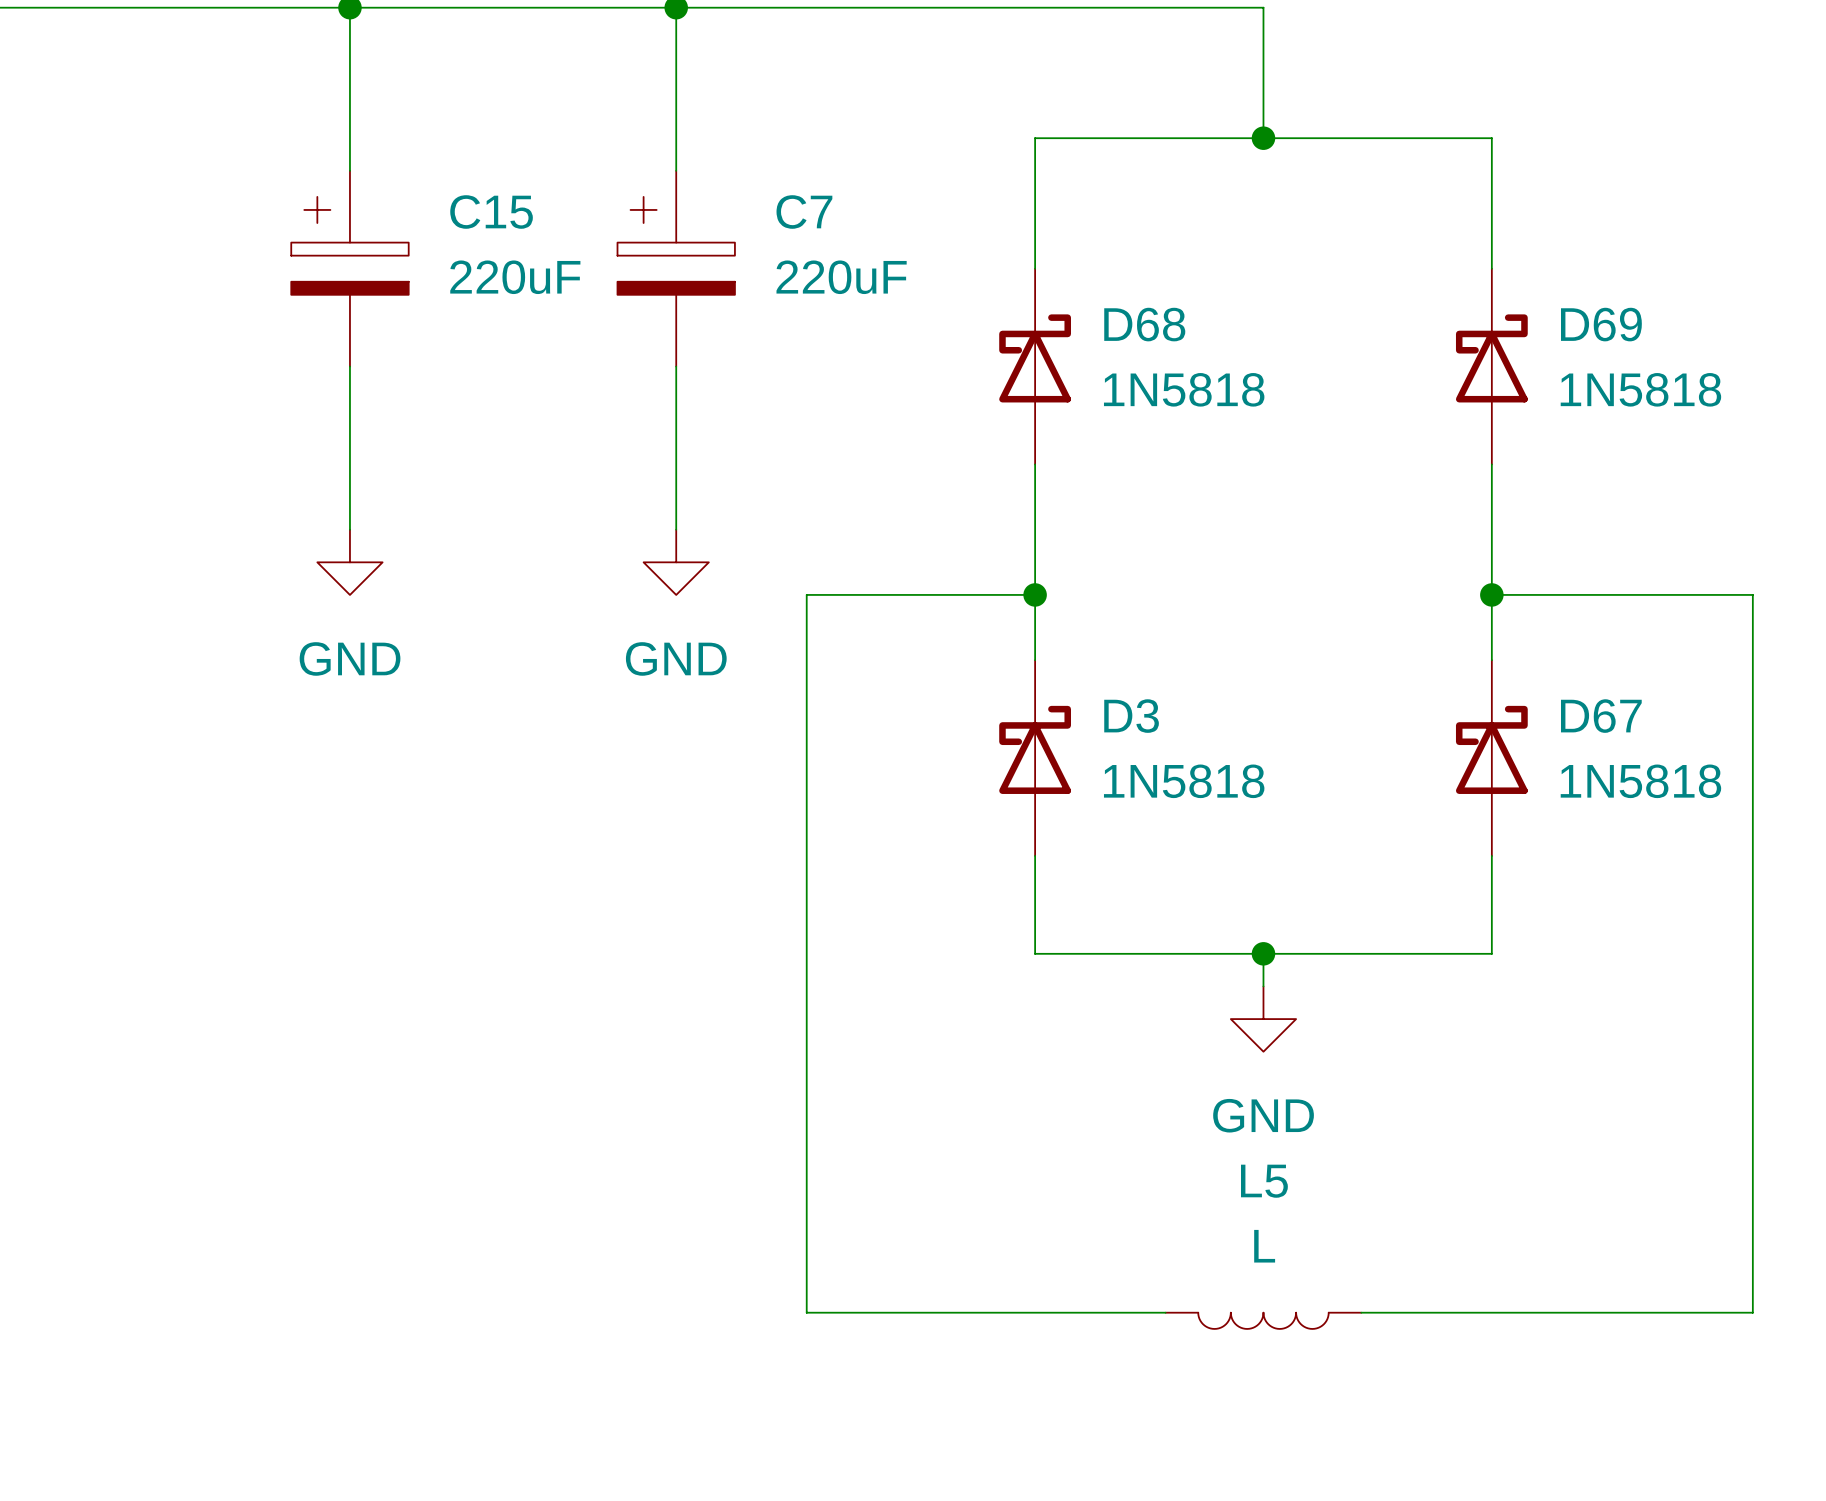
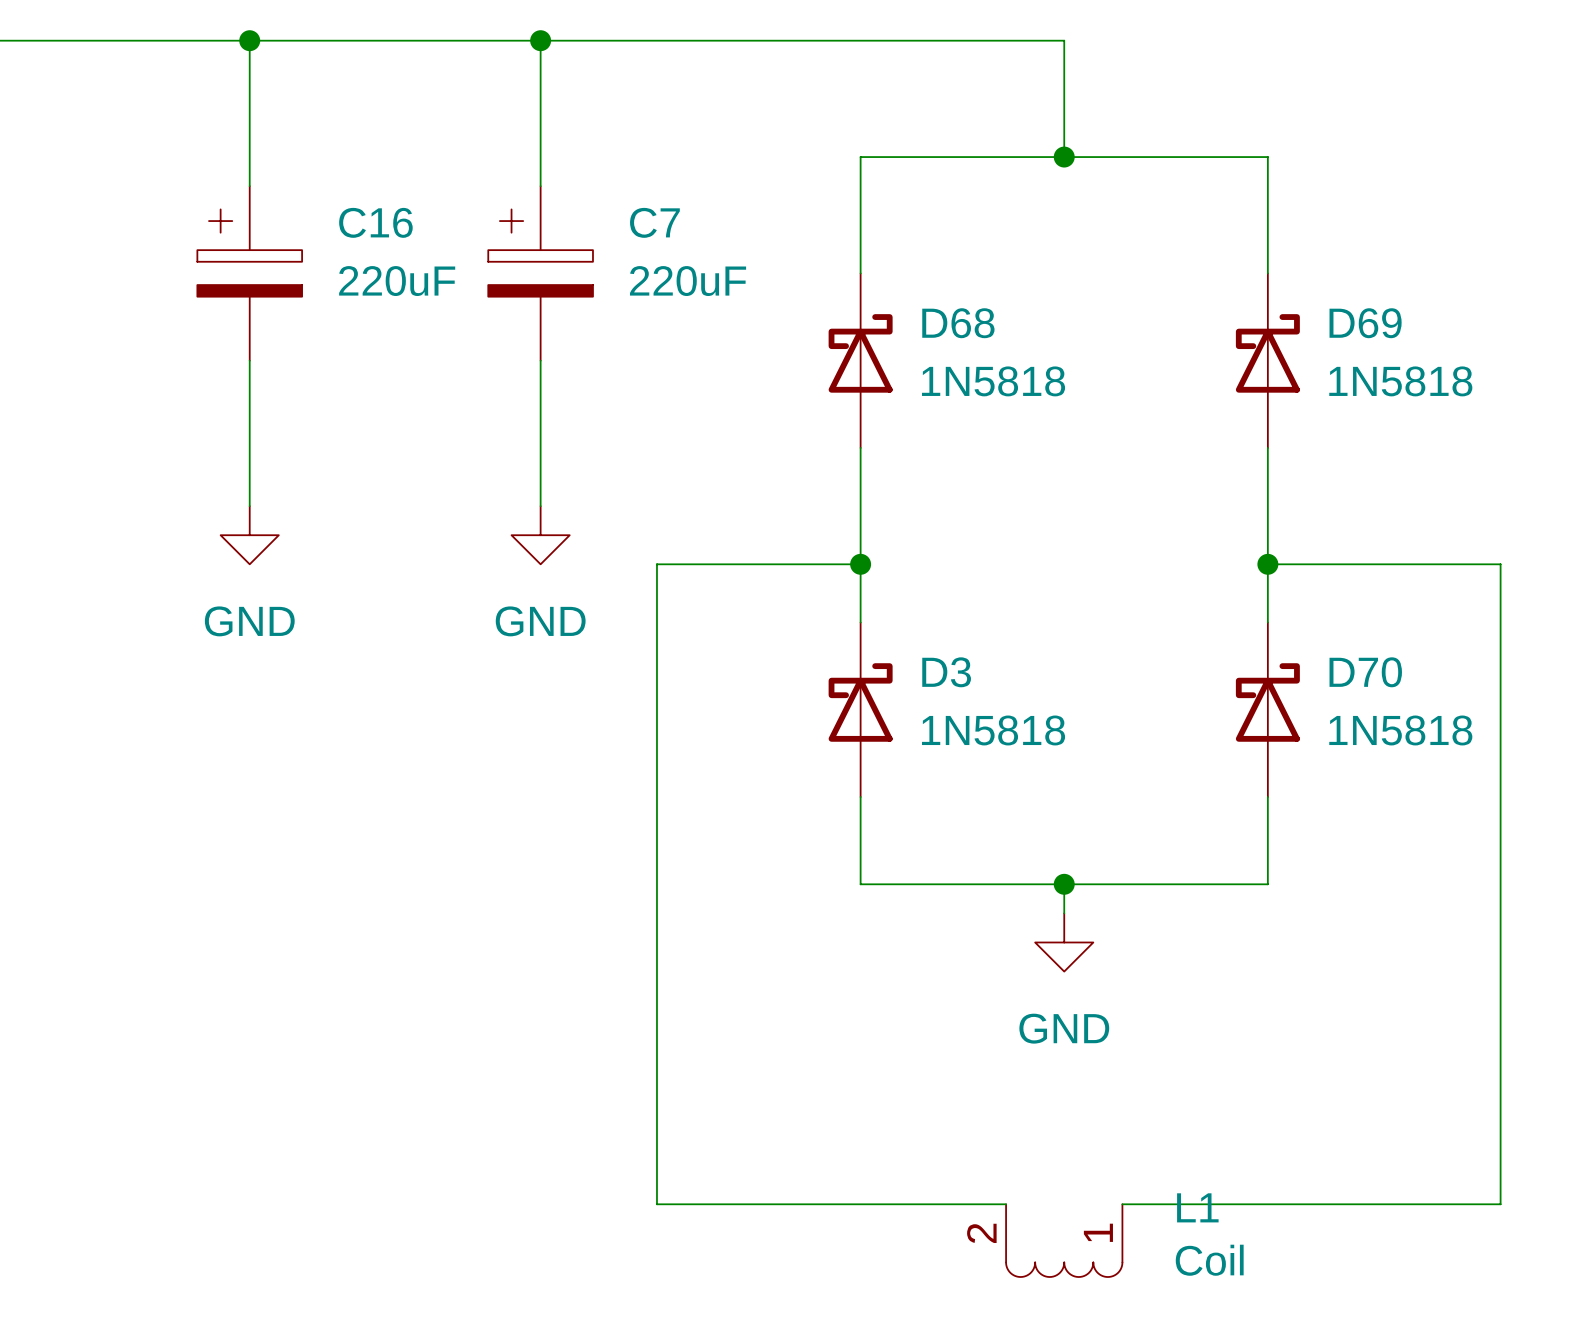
C15 name: C15 (491, 212) -> C16 (375, 222)
D67 name: D67 (1601, 716) -> D70 (1365, 672)
L5: L (1263, 1320) -> none
L1: none -> Coil (1064, 1240)

